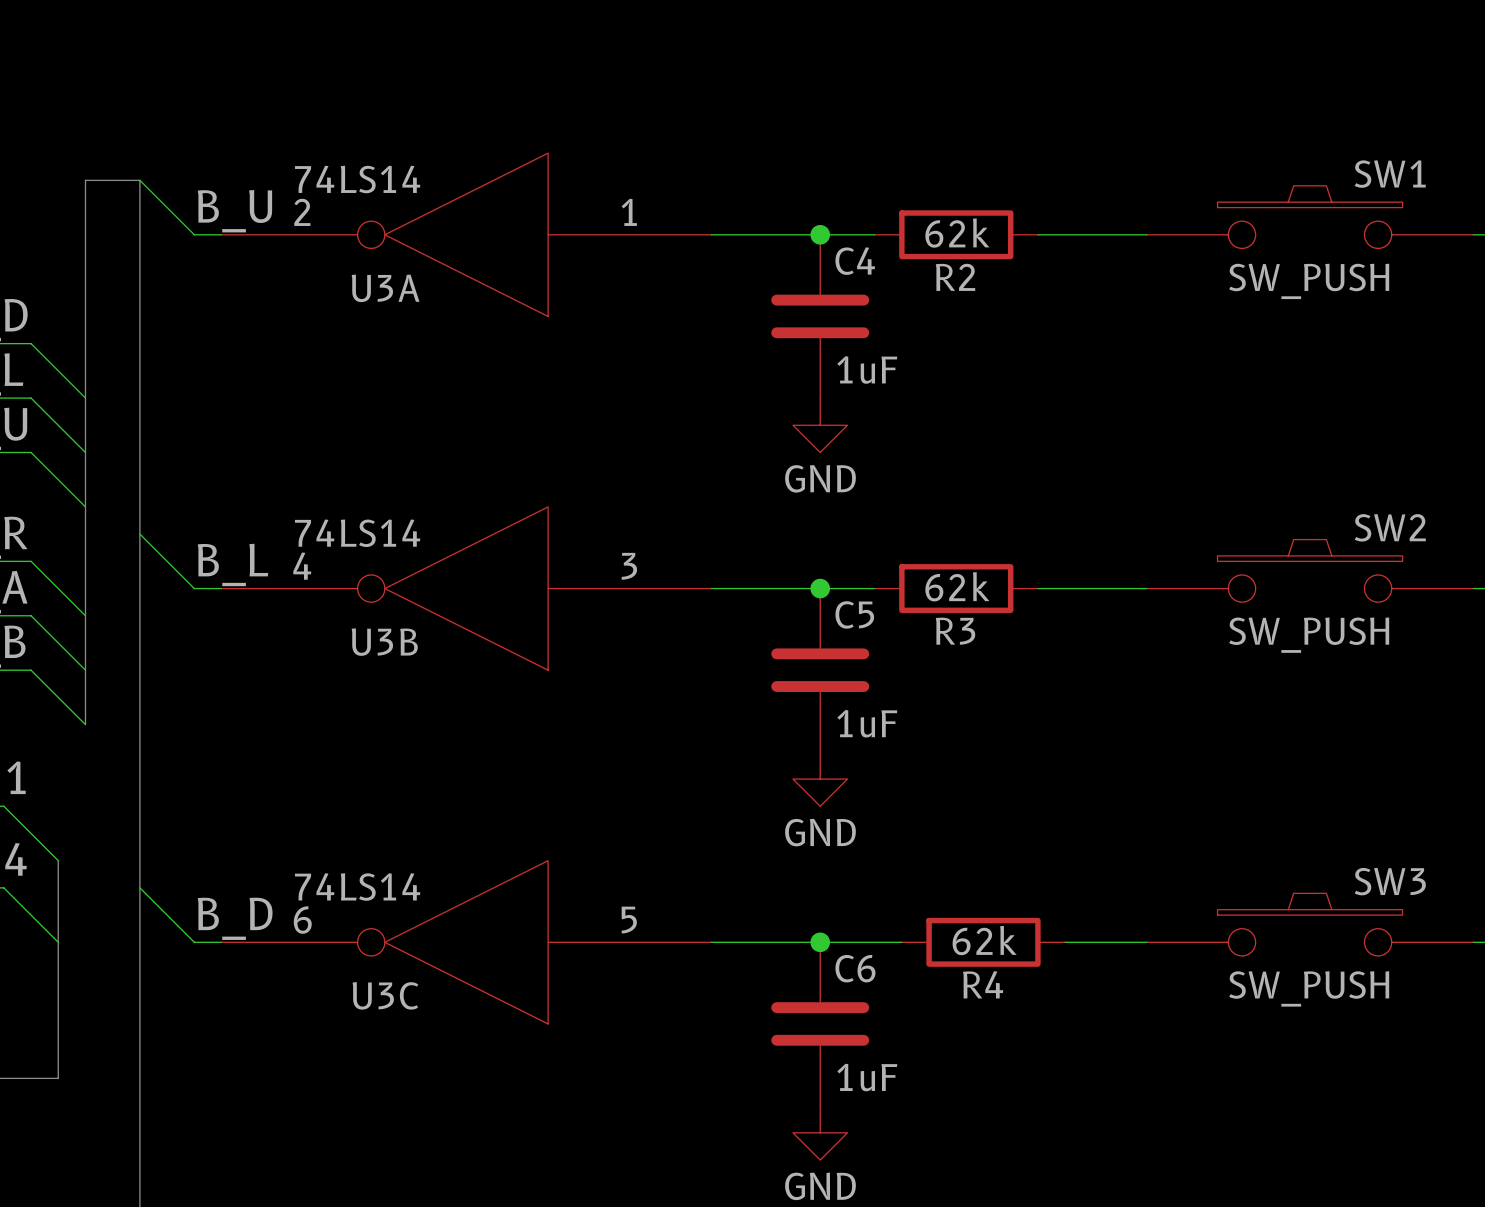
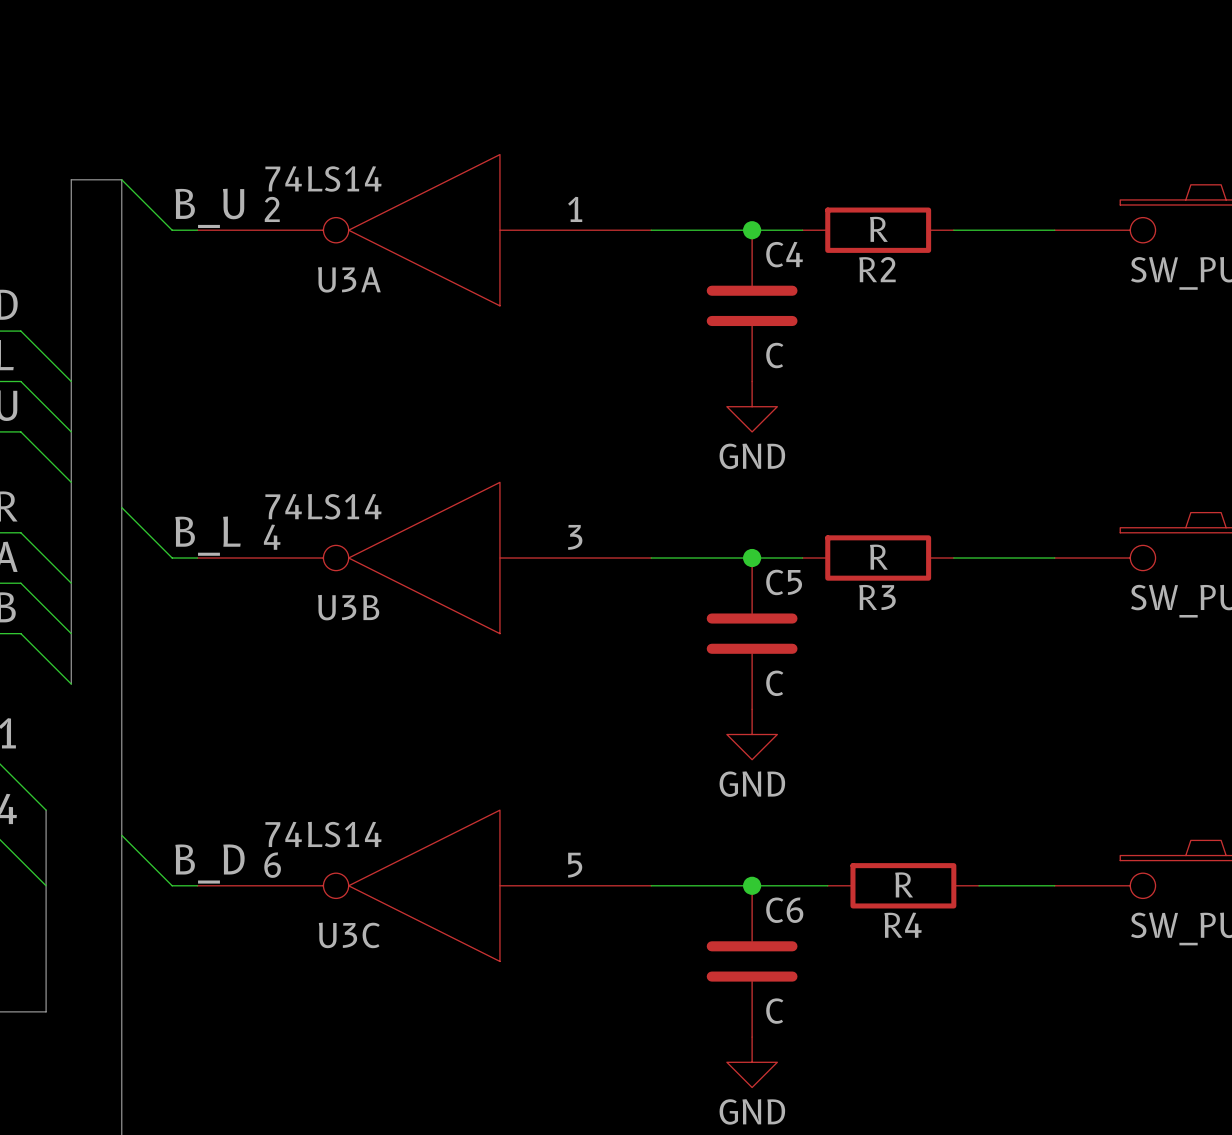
R2 value: 62k (957, 233) -> R (878, 229)
C4 value: 1uF (867, 369) -> C (774, 355)
R3 value: 62k (957, 586) -> R (878, 557)
C5 value: 1uF (867, 723) -> C (774, 683)
R4 value: 62k (984, 940) -> R (904, 884)
C6 value: 1uF (867, 1077) -> C (774, 1011)

